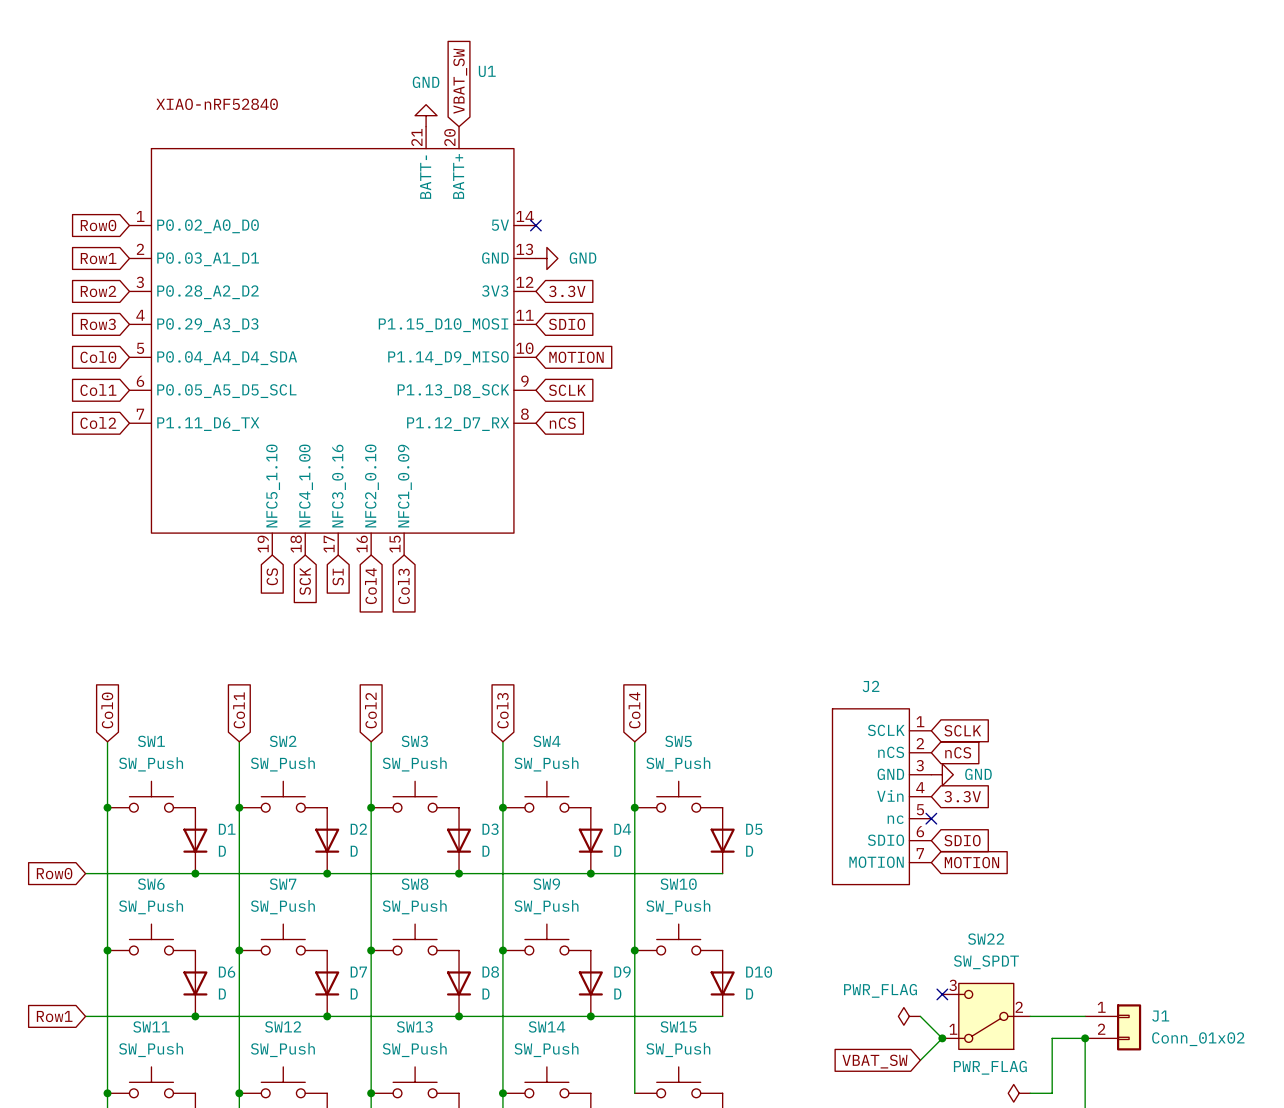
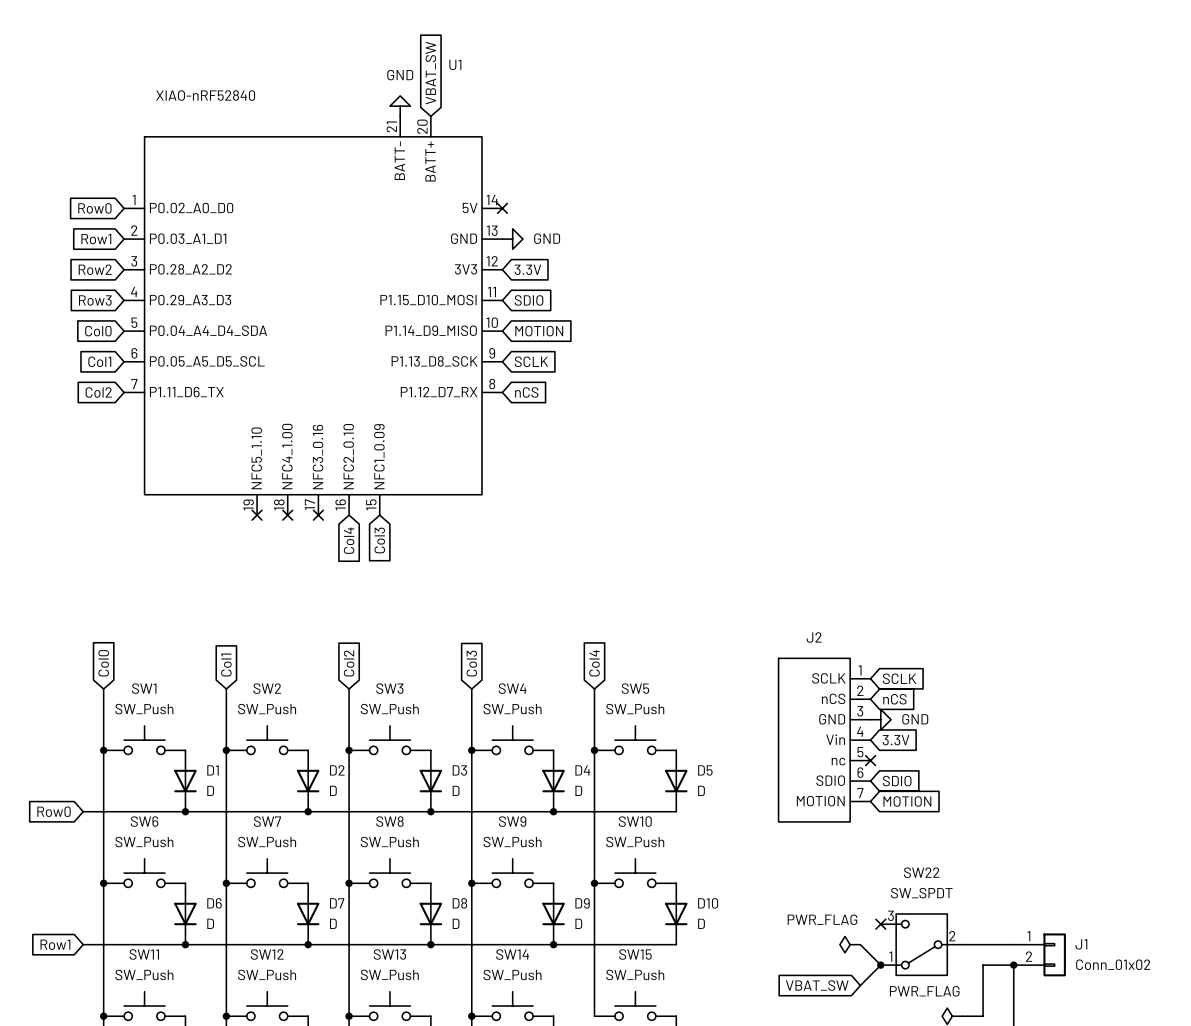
no-connect mark: none -> (257, 515)
no-connect mark: none -> (287, 515)
no-connect mark: none -> (318, 515)
global label: CS (272, 576) -> none
global label: SI (338, 577) -> none
global label: SCK (305, 581) -> none

